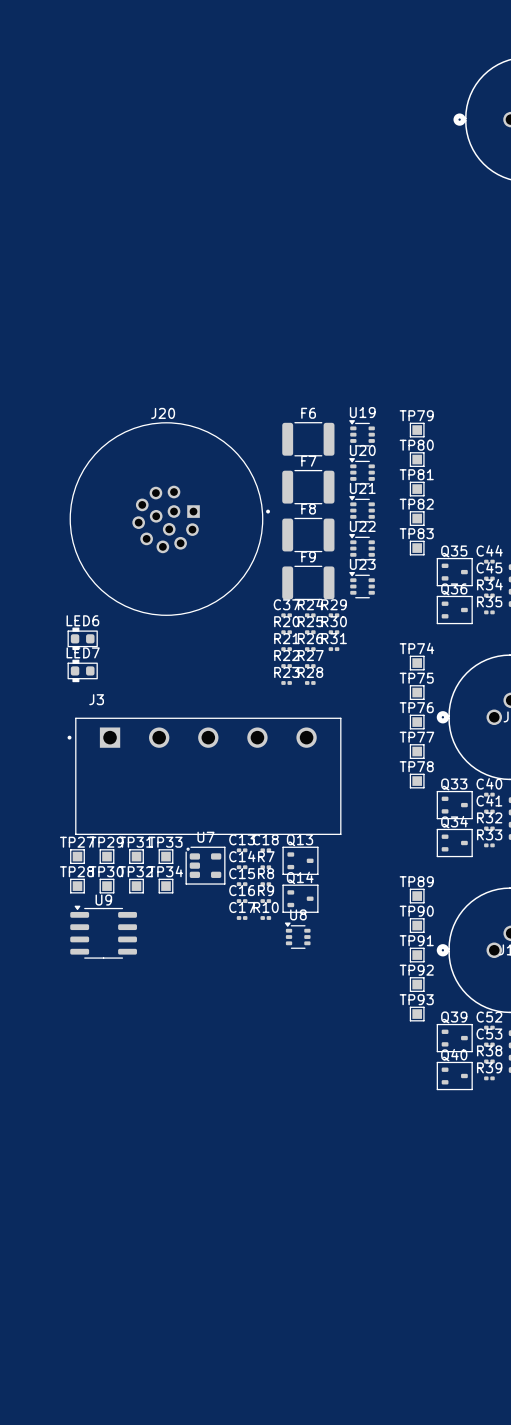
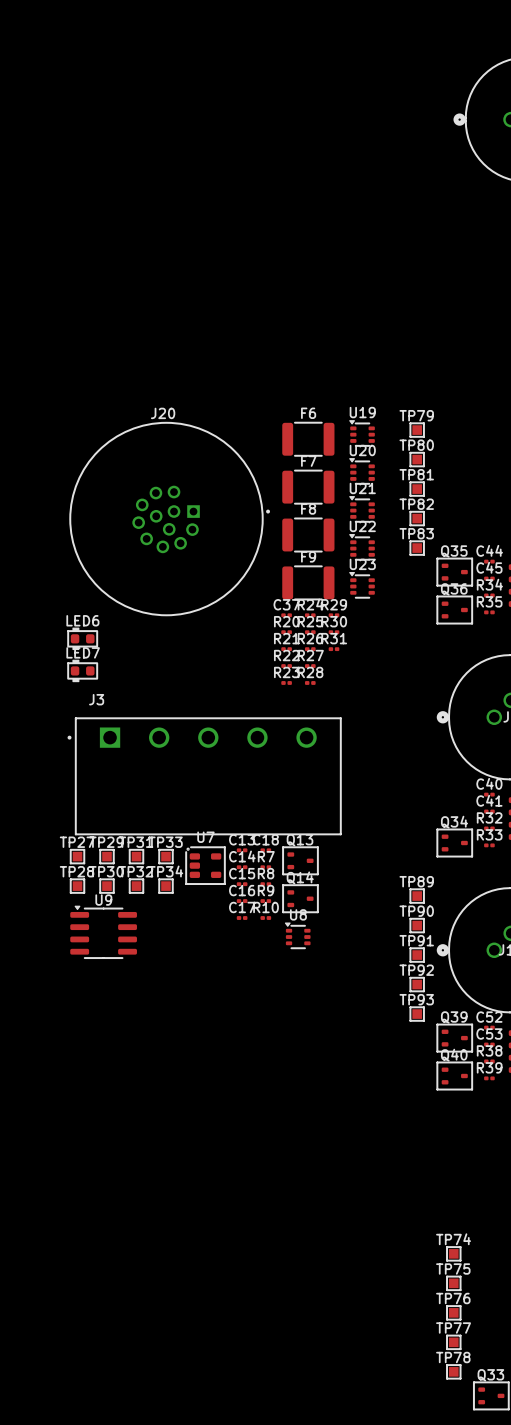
TP74 position: (417, 663) -> (453, 1253)
TP75 position: (417, 692) -> (453, 1283)
TP76 position: (417, 722) -> (453, 1312)
TP77 position: (417, 751) -> (453, 1342)
TP78 position: (417, 781) -> (453, 1371)
Q33 position: (454, 805) -> (491, 1395)

